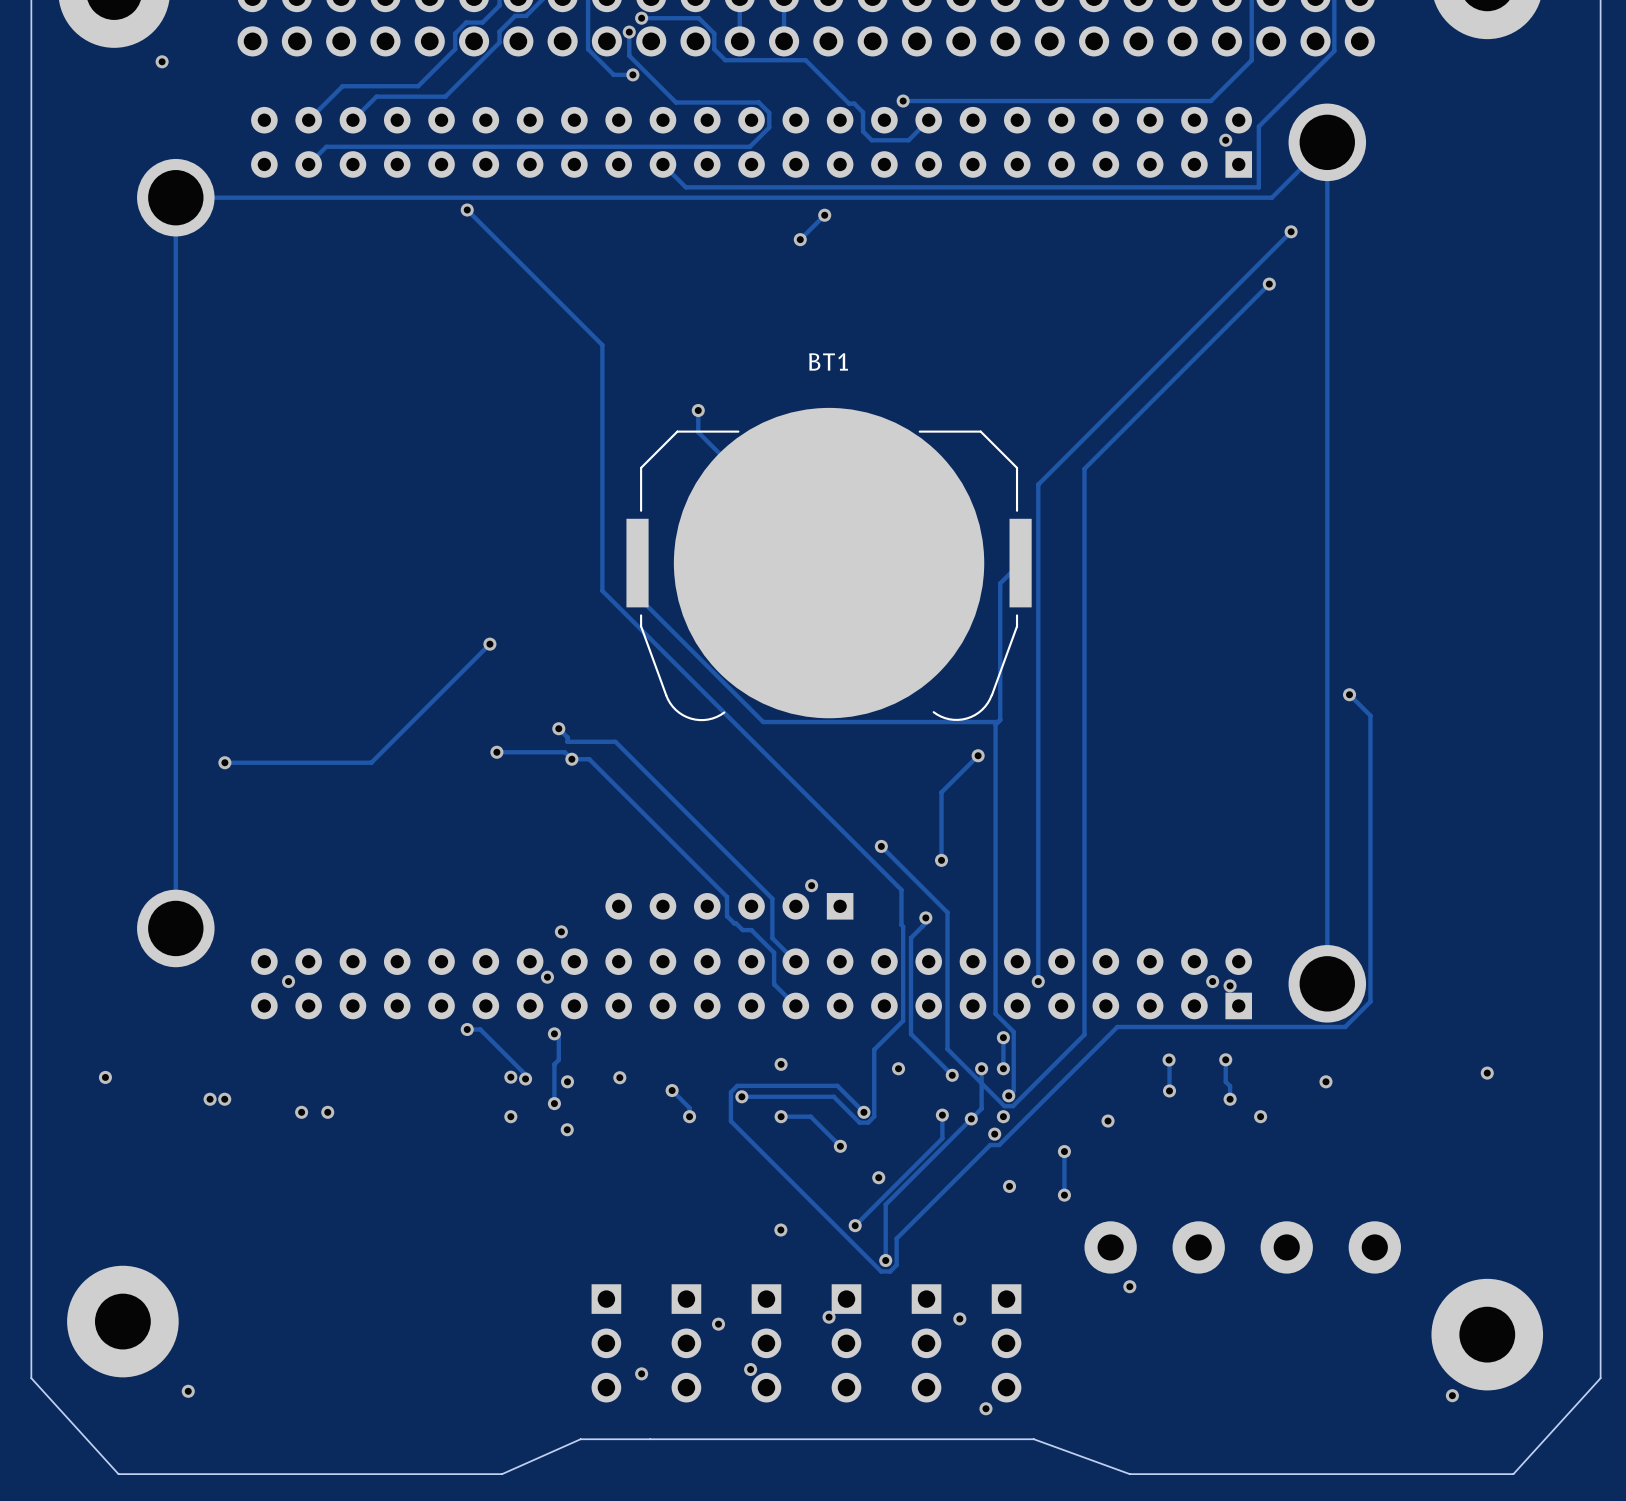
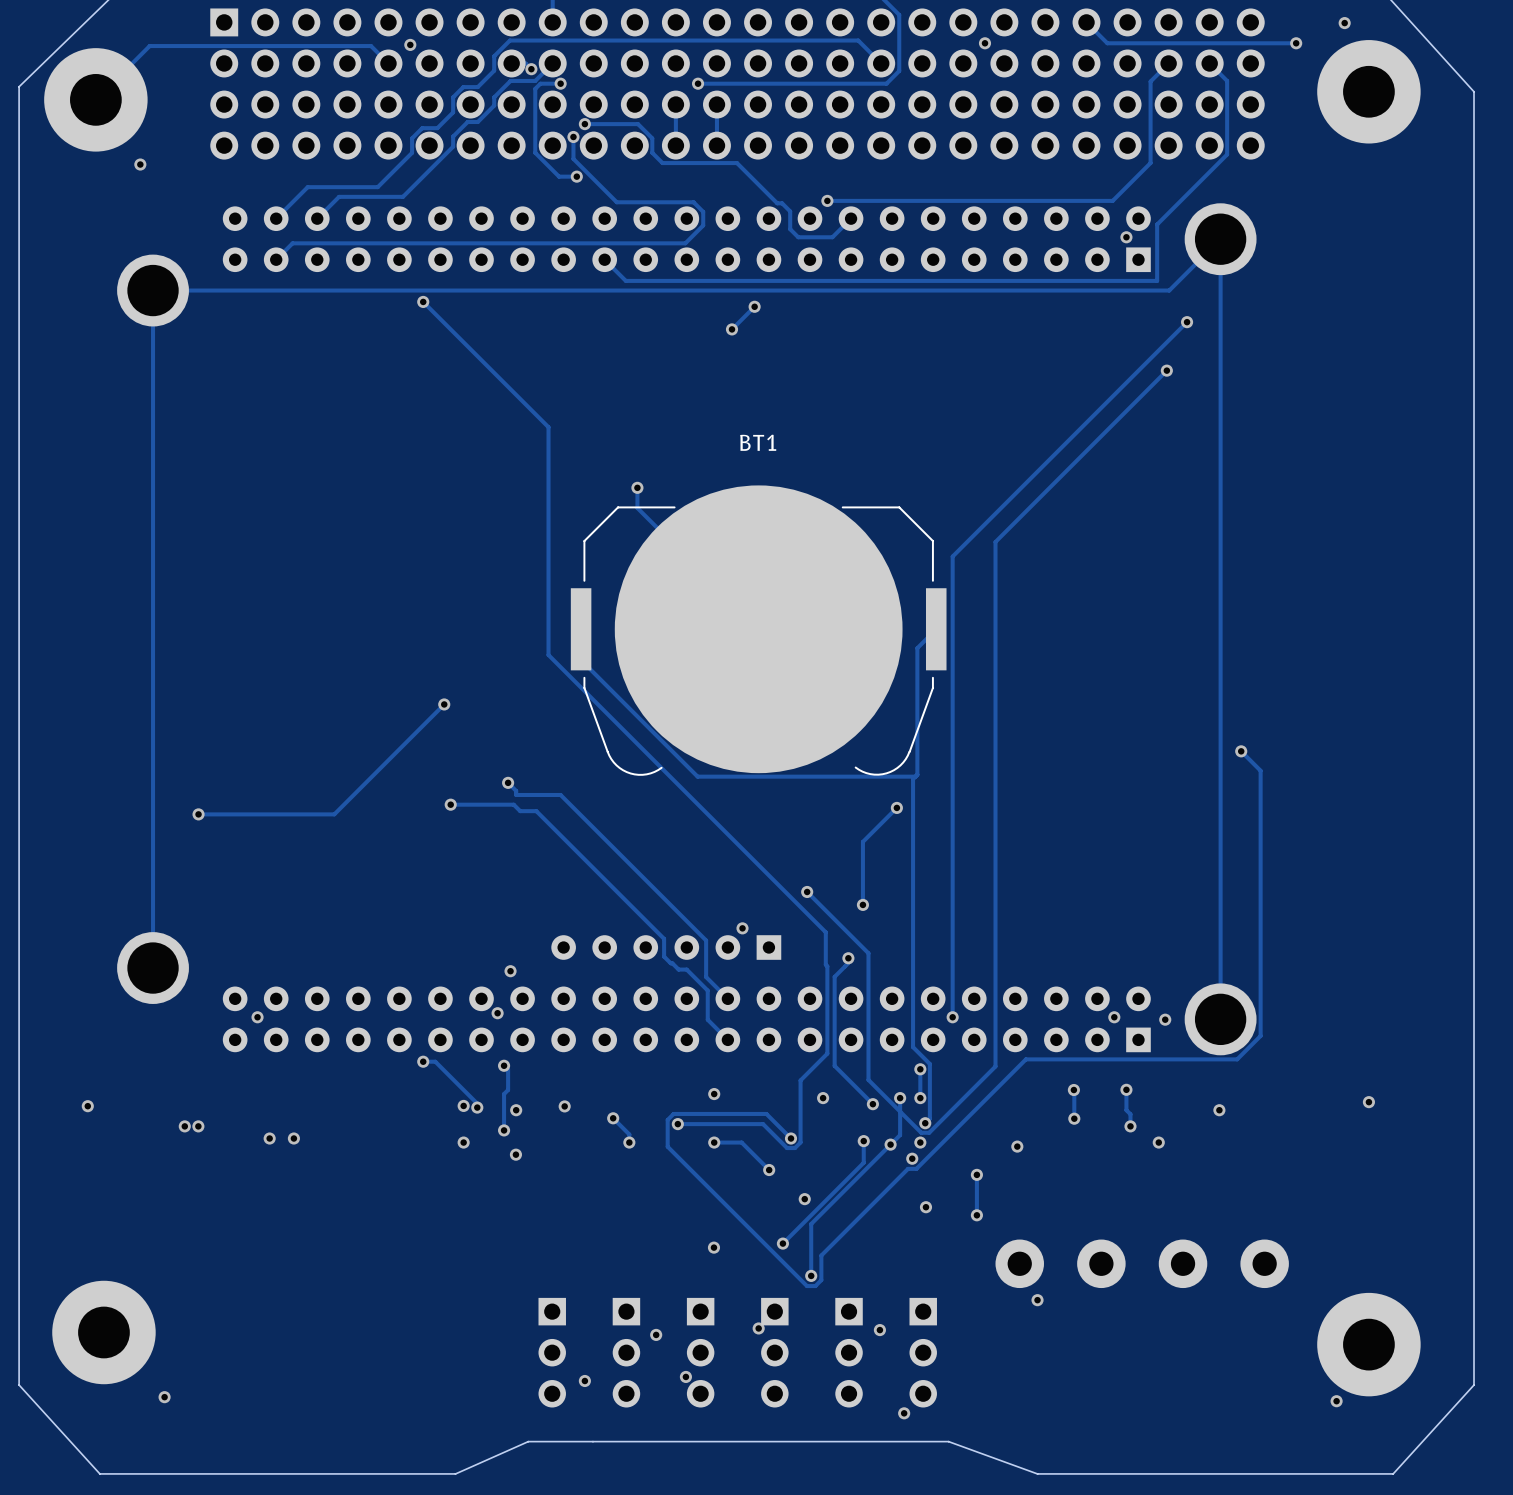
via: (571, 759) -> none
via position: (1230, 985) -> (1165, 1019)

